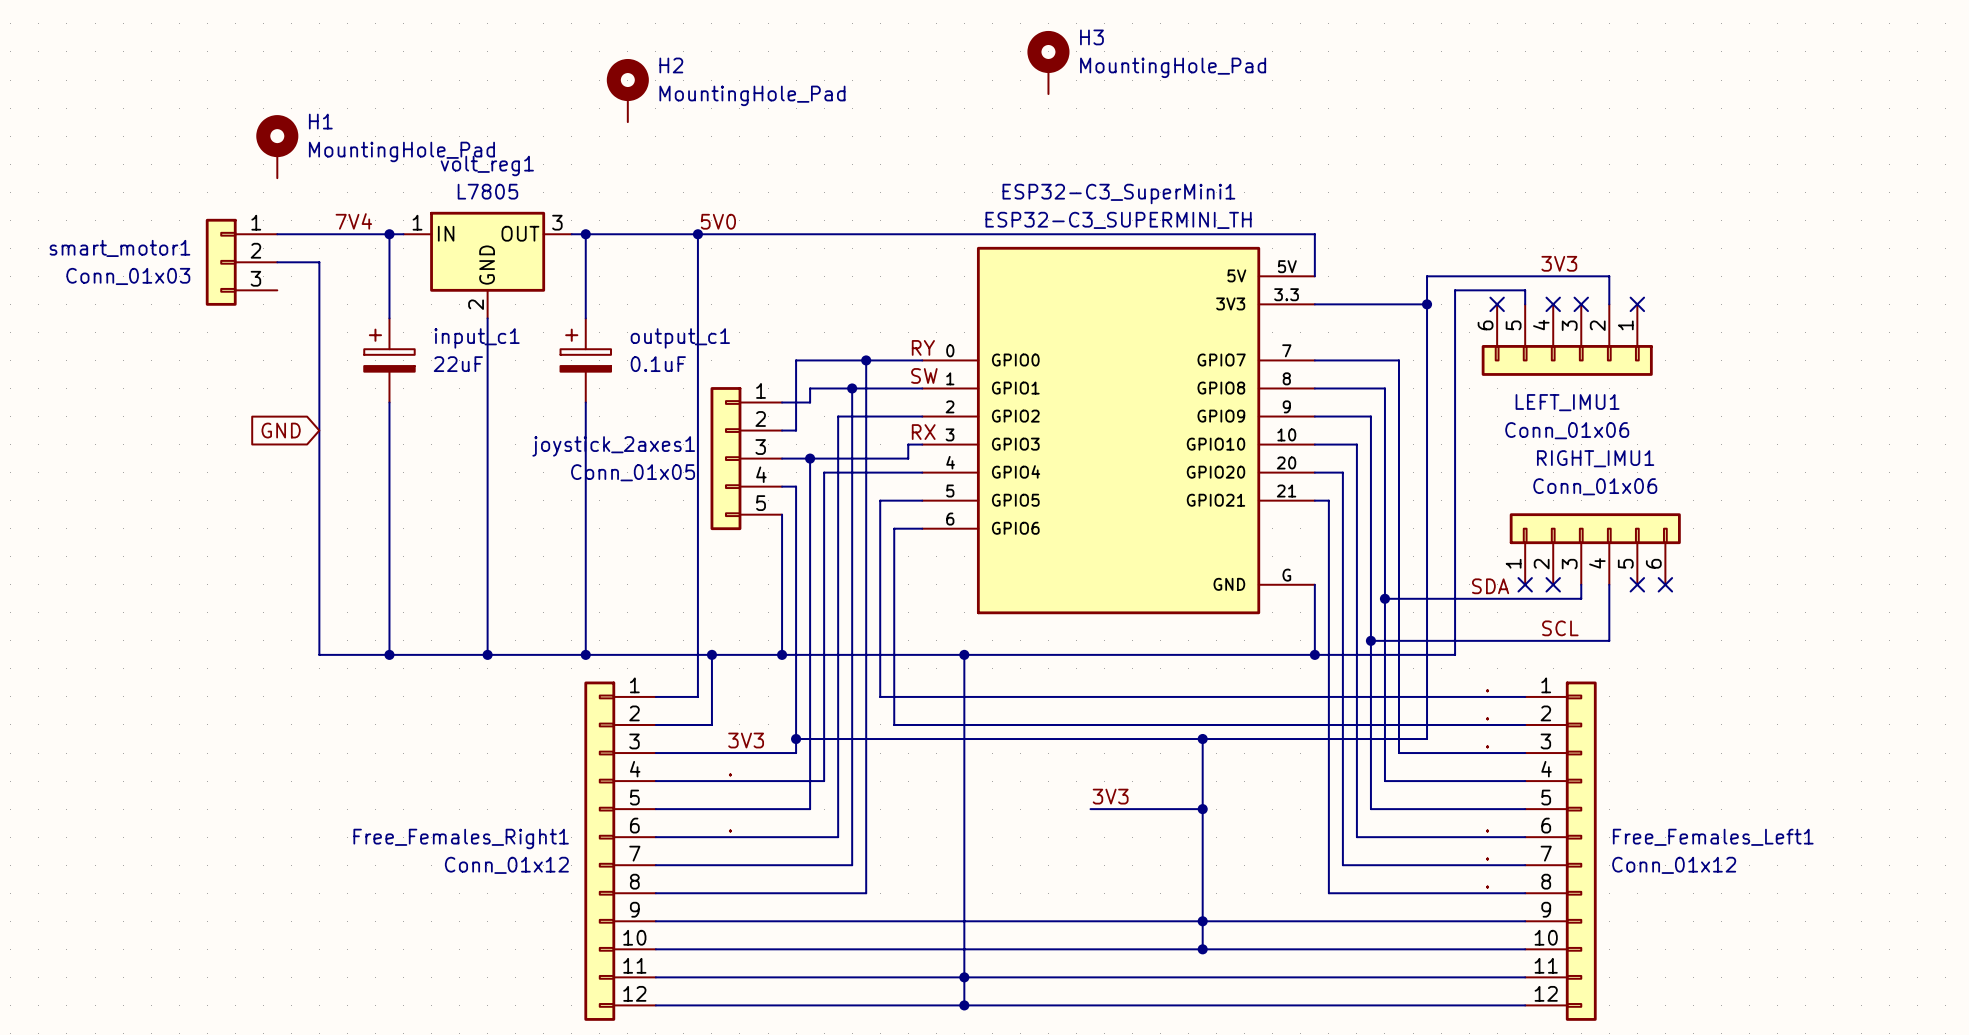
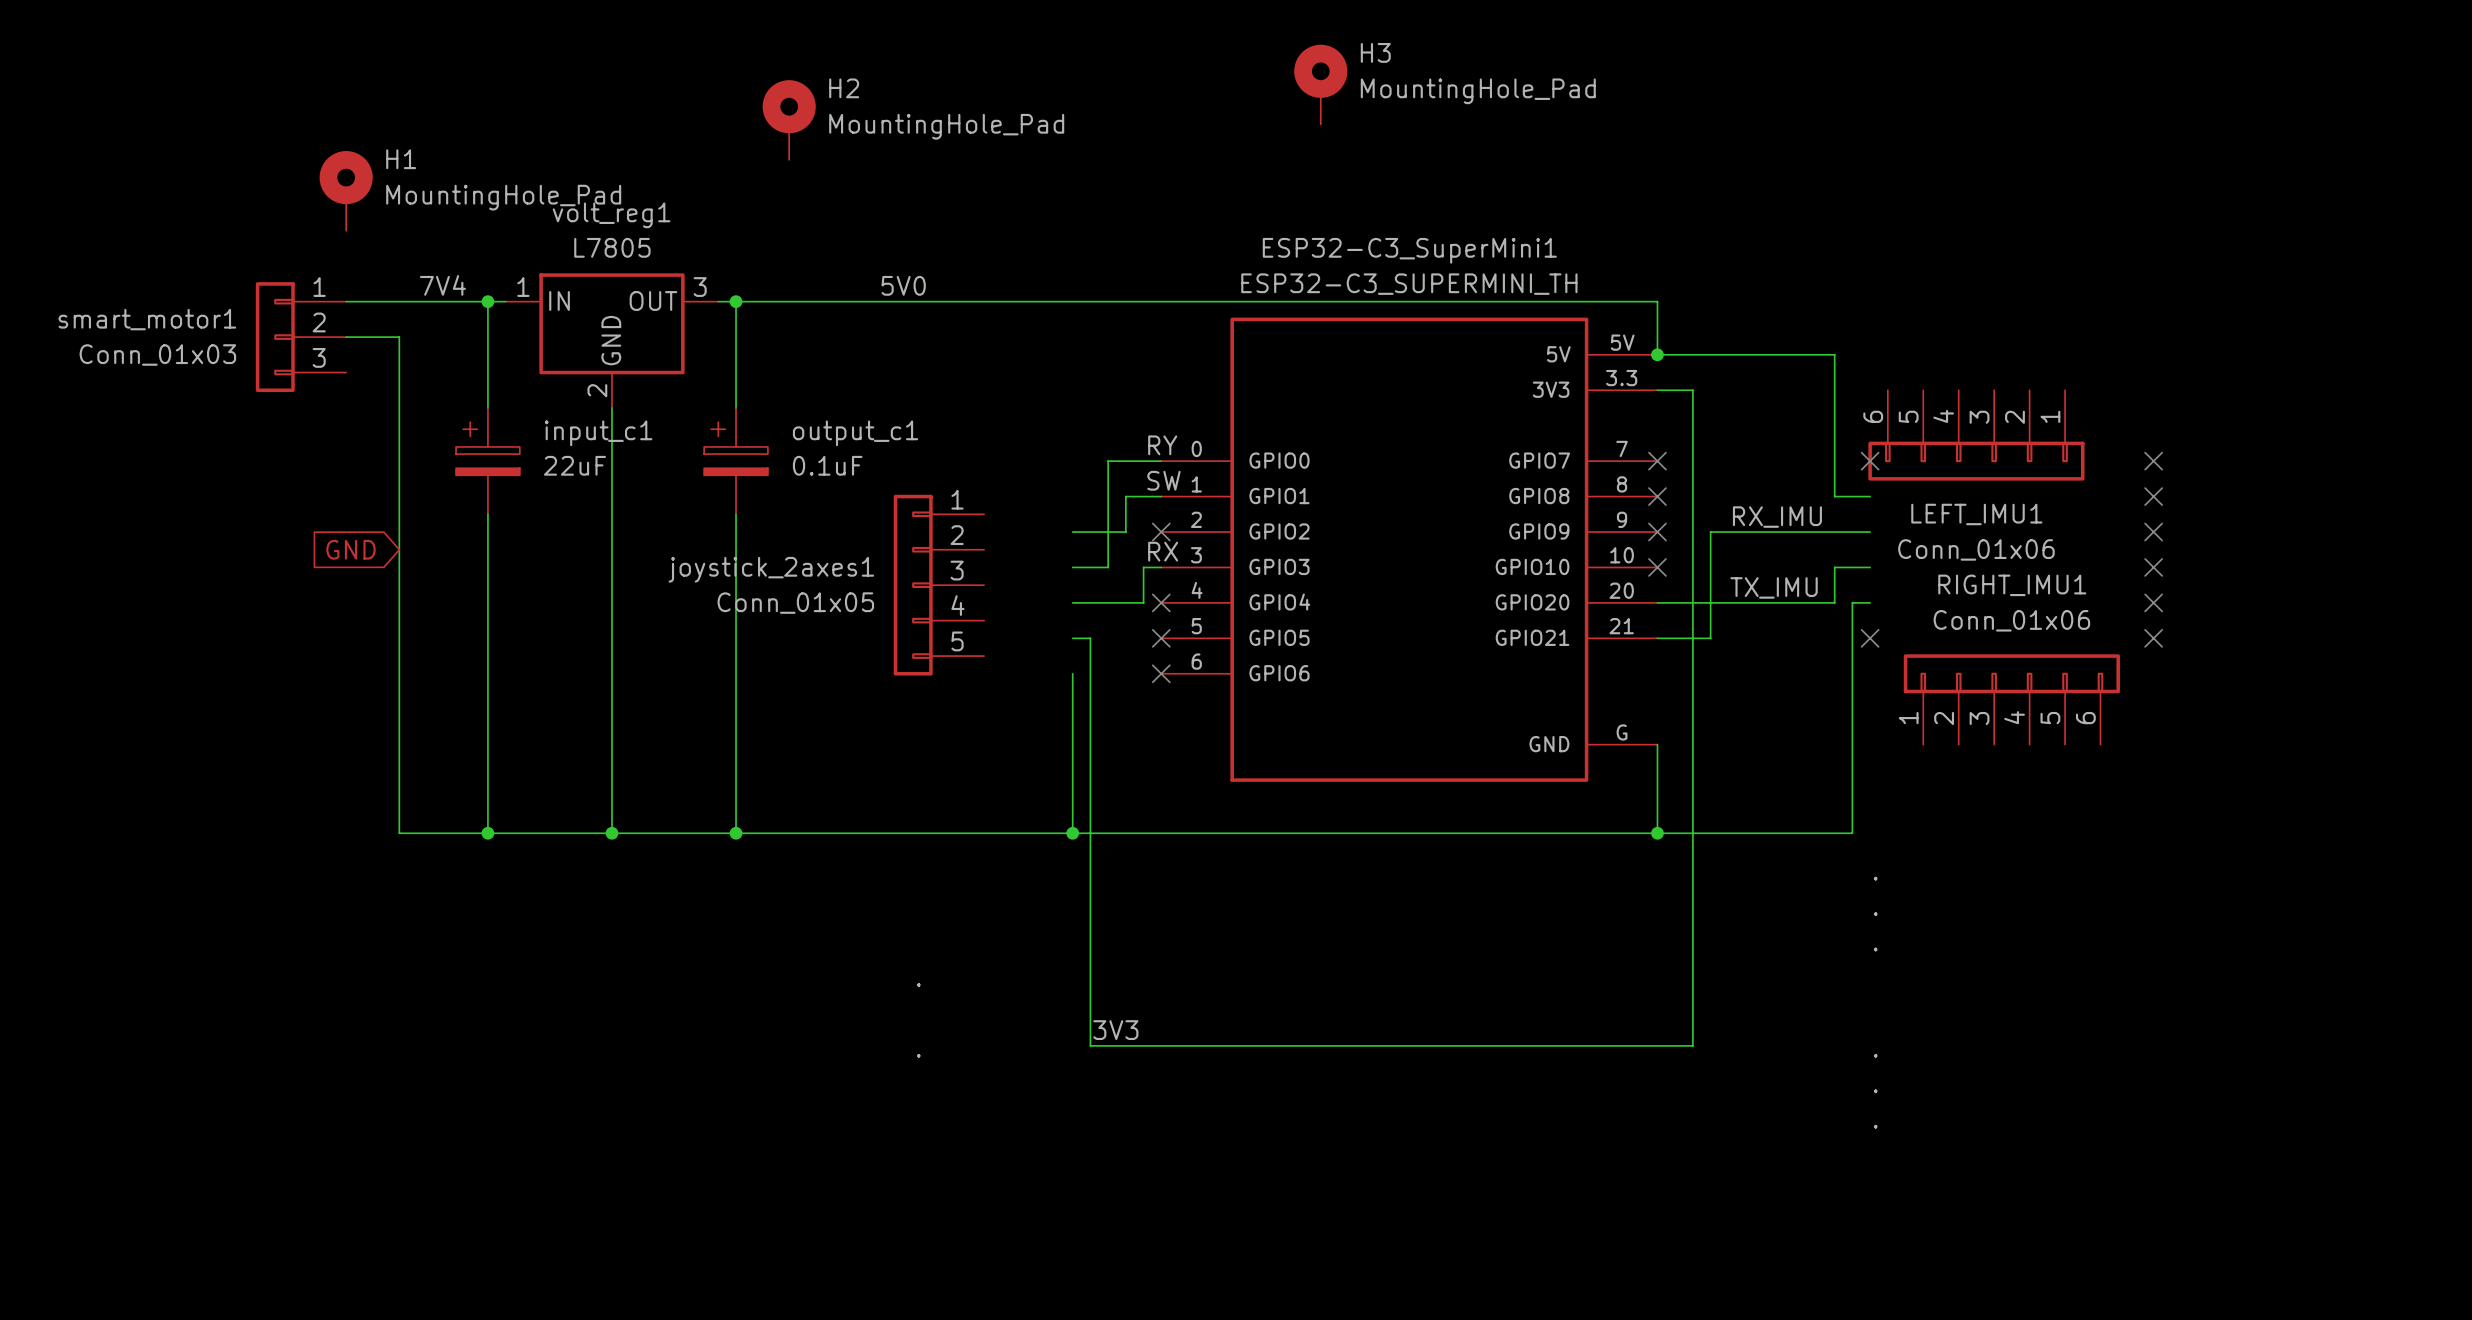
wire: (697, 234) (697, 696) (655, 696) -> none
junction: (697, 234) -> none
label: 3V3 (1559, 263) -> none
junction: none -> (1657, 354)
wire: (1427, 276) (1427, 739) (796, 739) -> (1799, 354) (1657, 354)
wire: (1455, 276) (1609, 276) (1609, 304) -> none
wire: (1455, 290) (1525, 290) (1525, 304) -> (1834, 372) (1834, 354)
wire: (1342, 304) (1427, 304) -> (1692, 390) (1692, 602) (1834, 602)
junction: (1427, 304) -> none
no-connect mark: (1497, 304) -> none
no-connect mark: (1553, 304) -> none
no-connect mark: (1581, 304) -> none
no-connect mark: (1637, 304) -> none
wire: (866, 360) (866, 500) -> (1072, 638) (1090, 638)
junction: (866, 360) -> none
wire: (880, 360) (796, 360) (796, 430) (782, 430) -> (1108, 461) (1108, 567) (1072, 567)
wire: (1314, 360) (1398, 360) (1398, 753) (1525, 753) -> none
no-connect mark: none -> (1657, 461)
no-connect mark: none -> (1870, 461)
no-connect mark: none -> (2153, 461)
wire: (852, 388) (852, 528) -> none
junction: (852, 388) -> none
wire: (894, 388) (810, 388) (810, 402) (782, 402) -> none
wire: (1314, 388) (1384, 388) (1384, 781) (1525, 781) -> none
no-connect mark: none -> (1657, 496)
wire: (1455, 388) (1455, 444) -> (1834, 496) (1870, 496)
no-connect mark: none -> (2153, 496)
label: none -> RX_IMU (1777, 517)
wire: (852, 416) (838, 416) (838, 837) (655, 837) -> none
wire: (894, 416) (922, 416) -> (1125, 532) (1125, 496)
no-connect mark: none -> (1161, 532)
wire: (1314, 416) (1356, 416) -> (1710, 567) (1710, 532)
no-connect mark: none -> (1657, 532)
wire: (1370, 416) (1370, 809) (1525, 809) -> (1728, 532) (1870, 532)
no-connect mark: none -> (2153, 532)
wire: (1314, 444) (1356, 444) -> none
no-connect mark: none -> (1657, 567)
wire: none -> (1834, 567) (1870, 567)
no-connect mark: none -> (2153, 567)
wire: (782, 458) (908, 458) -> none
wire: (810, 458) (810, 809) (655, 809) -> none
junction: (810, 458) -> none
label: none -> TX_IMU (1774, 587)
wire: (852, 472) (824, 472) (824, 781) (655, 781) -> none
wire: (908, 472) (922, 472) -> (1143, 602) (1143, 585)
no-connect mark: none -> (1161, 602)
wire: (1455, 472) (1455, 654) -> (1870, 602) (1852, 602) (1852, 833) (1834, 833)
no-connect mark: none -> (2153, 602)
wire: (782, 486) (796, 486) (796, 753) (655, 753) -> none
wire: (922, 500) (880, 500) (880, 696) (1525, 696) -> none
no-connect mark: none -> (1161, 638)
wire: (1328, 500) (1328, 893) (1525, 893) -> none
wire: (1356, 500) (1356, 837) (1525, 837) -> (1710, 638) (1675, 638)
no-connect mark: none -> (1870, 638)
no-connect mark: none -> (2153, 638)
wire: (782, 514) (782, 654) -> none
wire: (922, 528) (894, 528) (894, 724) (1525, 724) -> none
no-connect mark: none -> (1161, 673)
no-connect mark: (1525, 584) -> none
no-connect mark: (1553, 584) -> none
wire: (1581, 584) (1581, 598) (1384, 598) -> none
wire: (1609, 584) (1609, 640) (1370, 640) -> none
no-connect mark: (1637, 584) -> none
no-connect mark: (1665, 584) -> none
label: SDA (1490, 586) -> none
junction: (1384, 598) -> none
label: SCL (1560, 628) -> none
junction: (1370, 640) -> none
wire: (711, 654) (711, 724) (655, 724) -> none
junction: (711, 654) -> none
junction: (782, 654) -> none
wire: (852, 654) (852, 865) (655, 865) -> none
junction: none -> (1072, 833)
wire: (964, 654) (964, 1005) -> none
junction: (964, 654) -> none
junction: (796, 739) -> none
wire: (1202, 739) (1202, 949) -> none
junction: (1202, 739) -> none
label: 3V3 (746, 740) -> none
label: 3V3 (1110, 796) -> none
wire: (1090, 809) (1202, 809) -> none
junction: (1202, 809) -> none
label: none -> 3V3 (1115, 1030)
wire: (866, 823) (866, 893) (655, 893) -> none
wire: (1342, 823) (1342, 865) (1525, 865) -> (1692, 1045) (1090, 1045)
Free_Females_Right1: Conn_01x12 (620, 851) -> none
Free_Females_Left1: Conn_01x12 (1560, 851) -> none
wire: (655, 921) (1525, 921) -> none
junction: (1202, 921) -> none
wire: (655, 949) (1525, 949) -> none
junction: (1202, 949) -> none
wire: (655, 977) (1525, 977) -> none
junction: (964, 977) -> none
wire: (655, 1005) (1525, 1005) -> none
junction: (964, 1005) -> none

